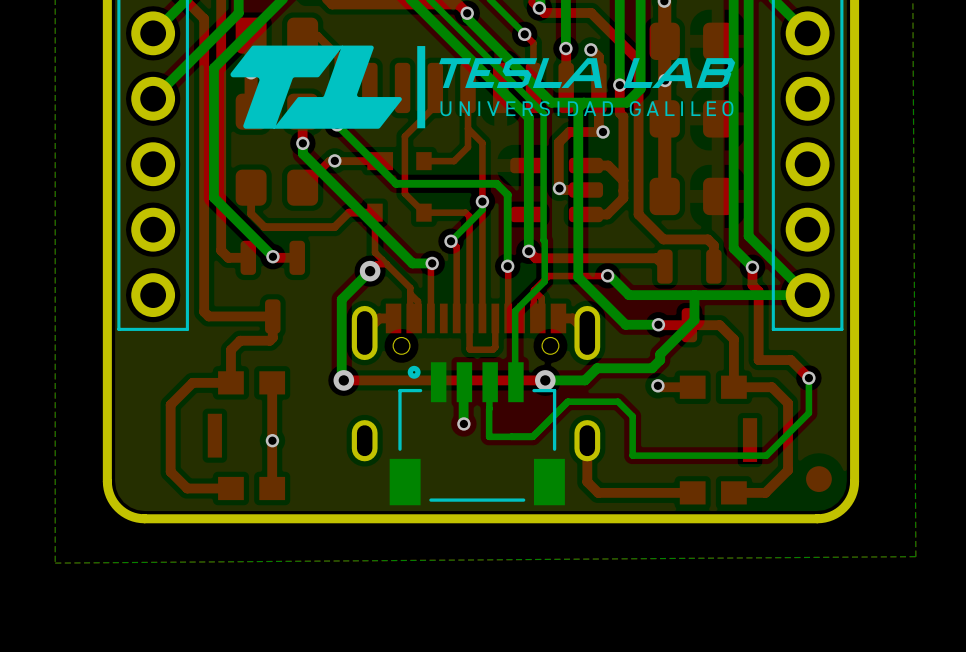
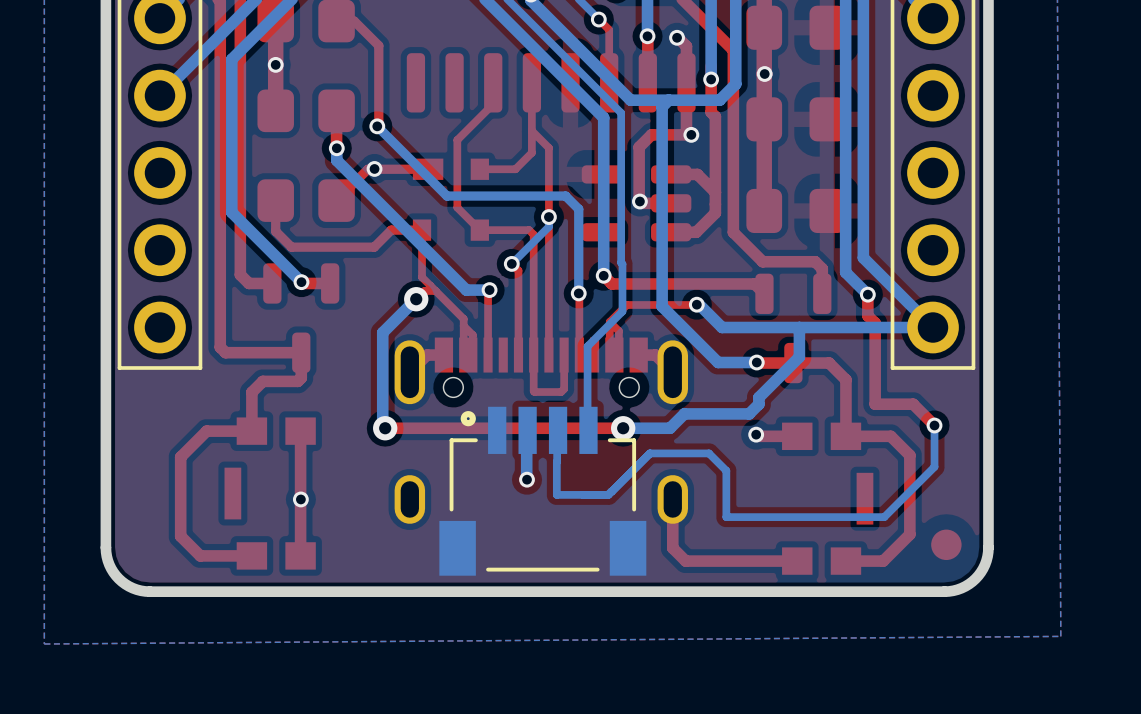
drawing: [230, 45, 736, 129] -> none

